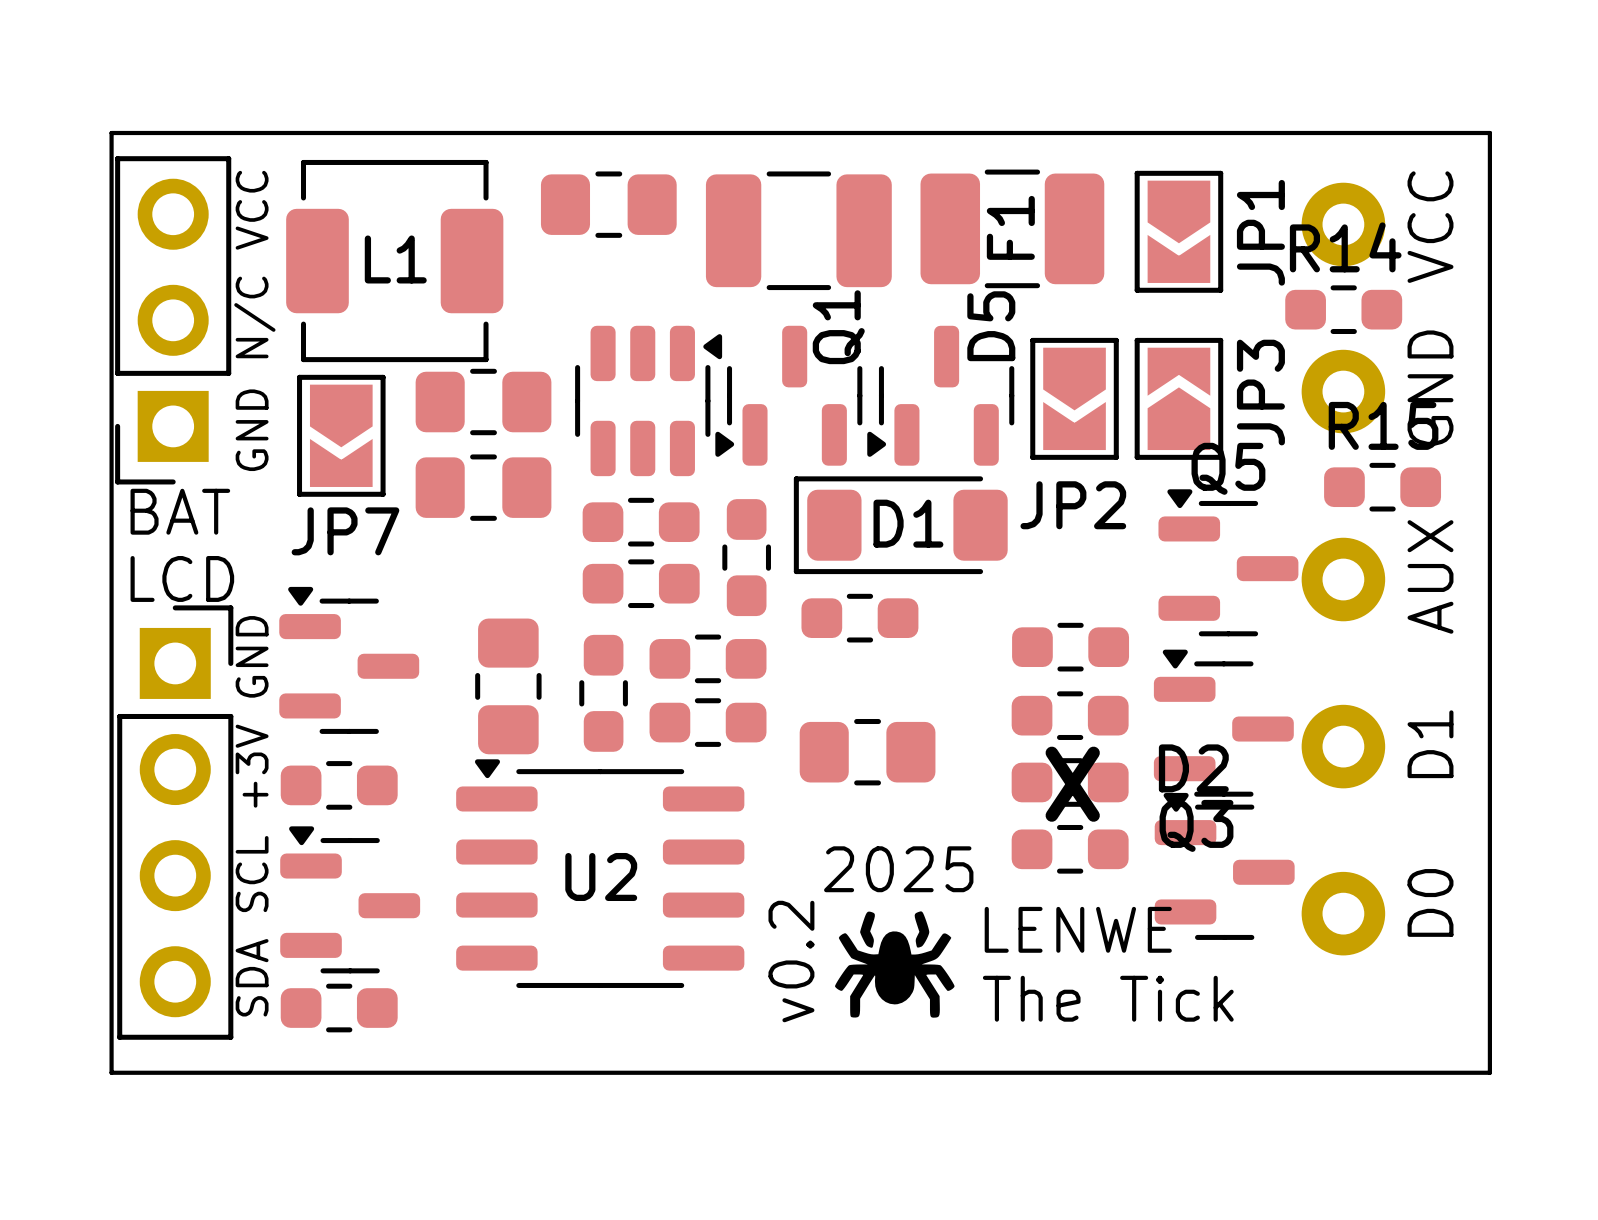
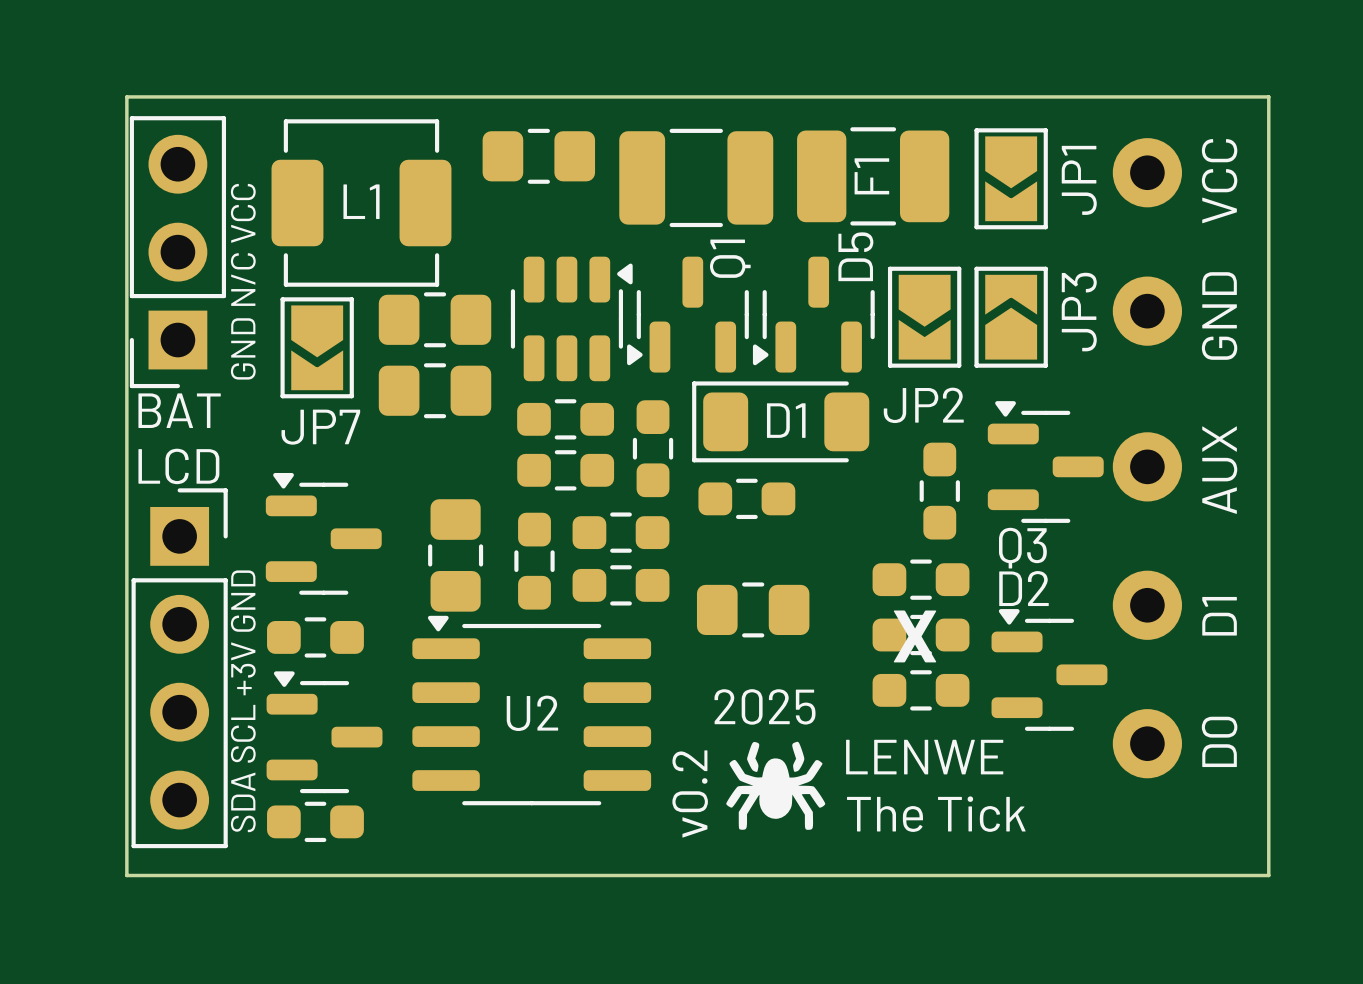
R14: (1343, 309) -> none
R15: (1382, 487) -> none
Q5: (1228, 562) -> none
part rotation: 0° (1070, 647) -> 90° clockwise (939, 491)
Q3 position: (1223, 723) -> (1045, 462)
D2 position: (1224, 866) -> (1049, 669)

